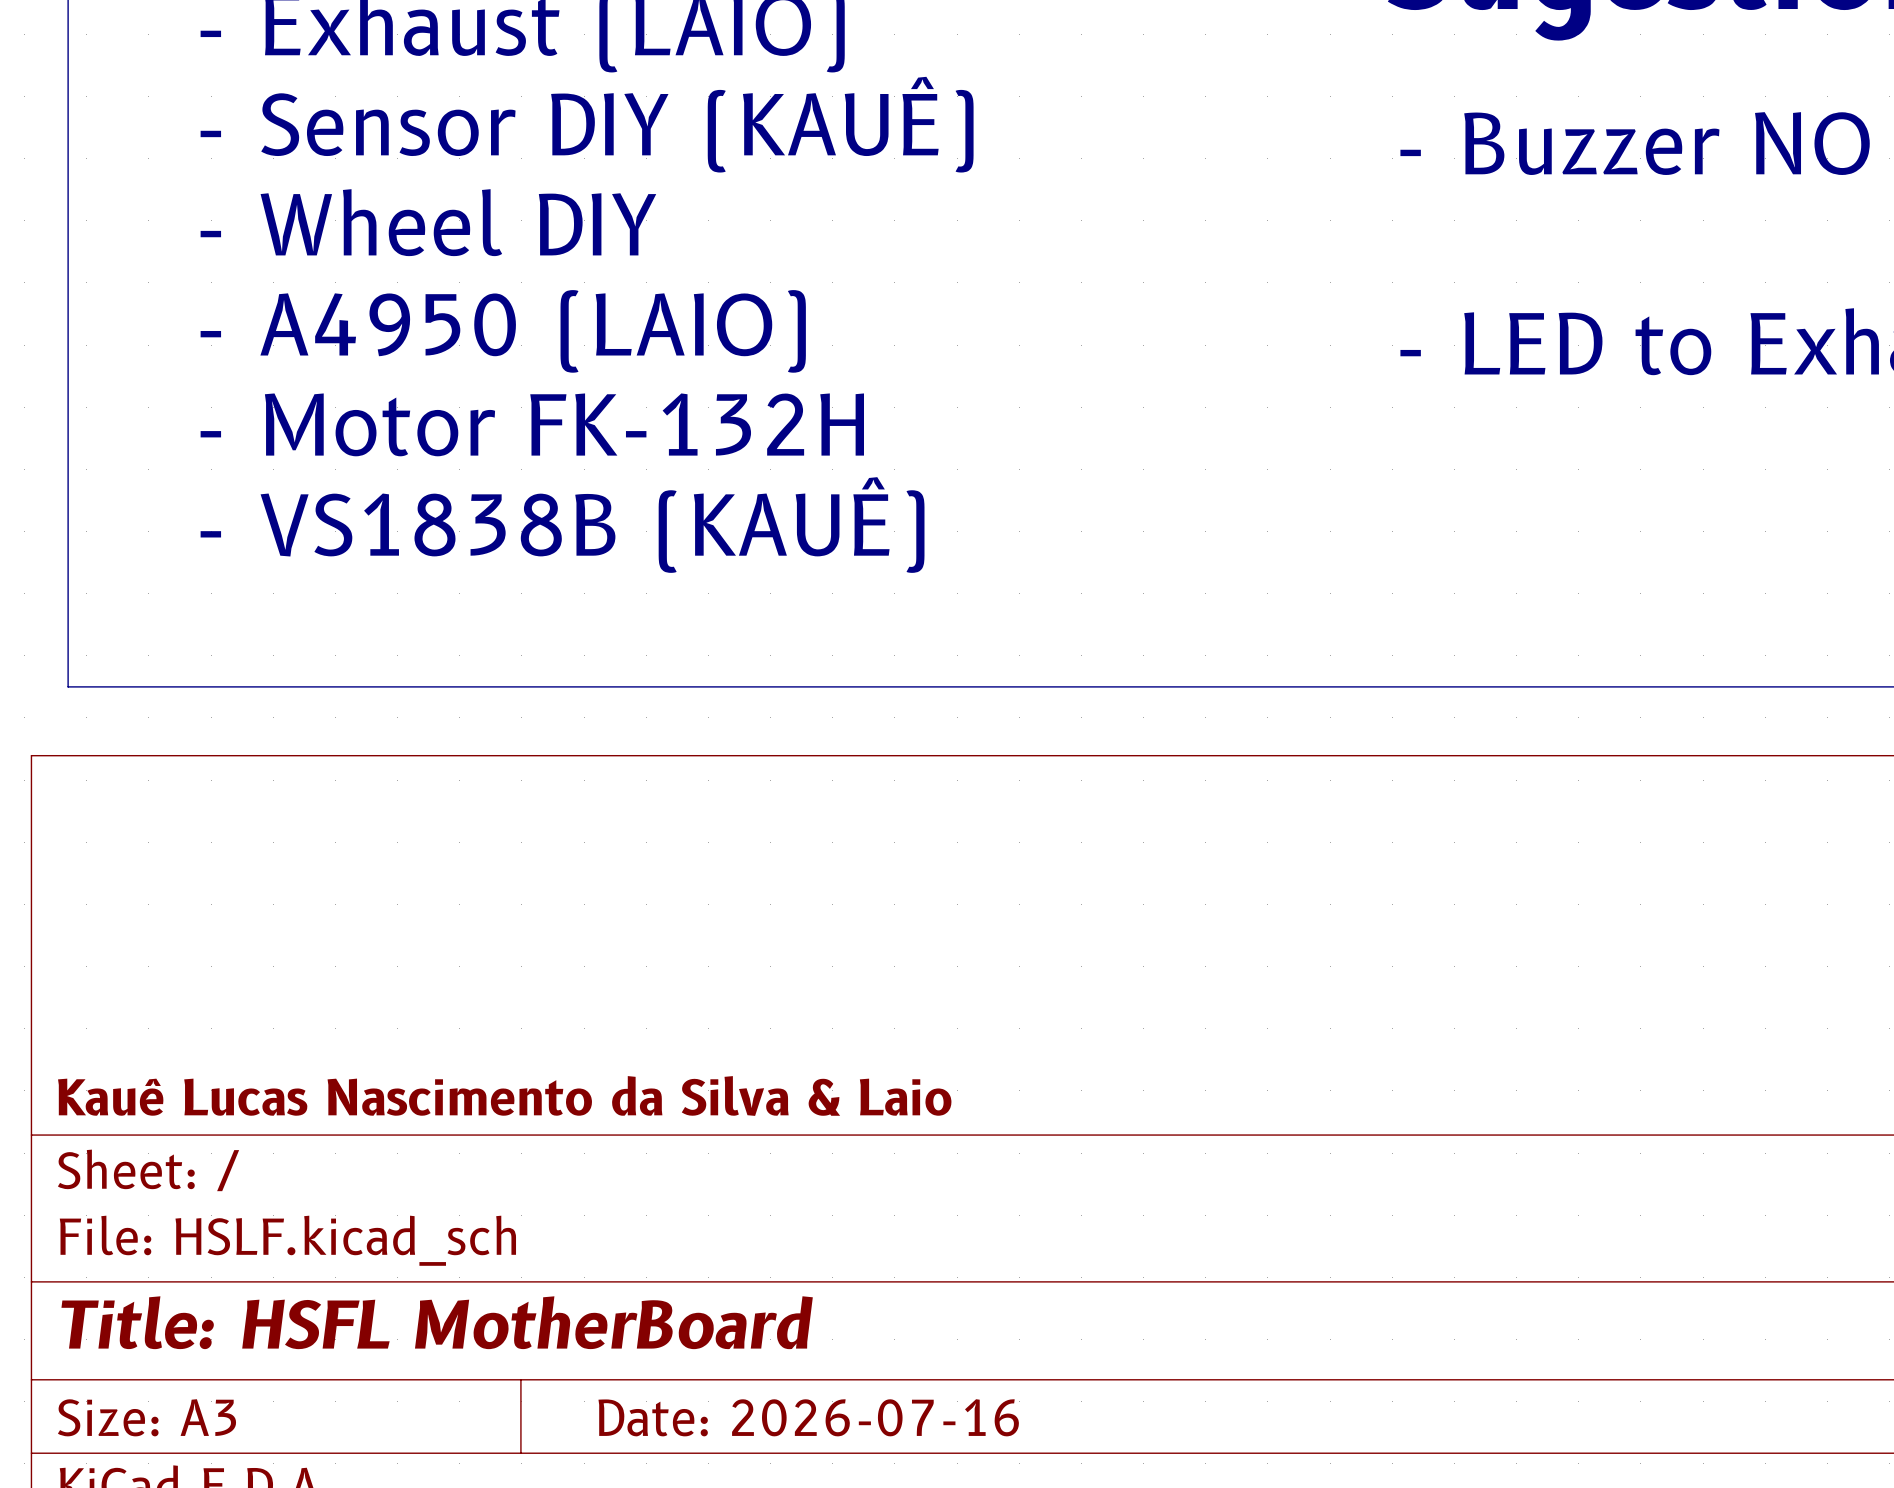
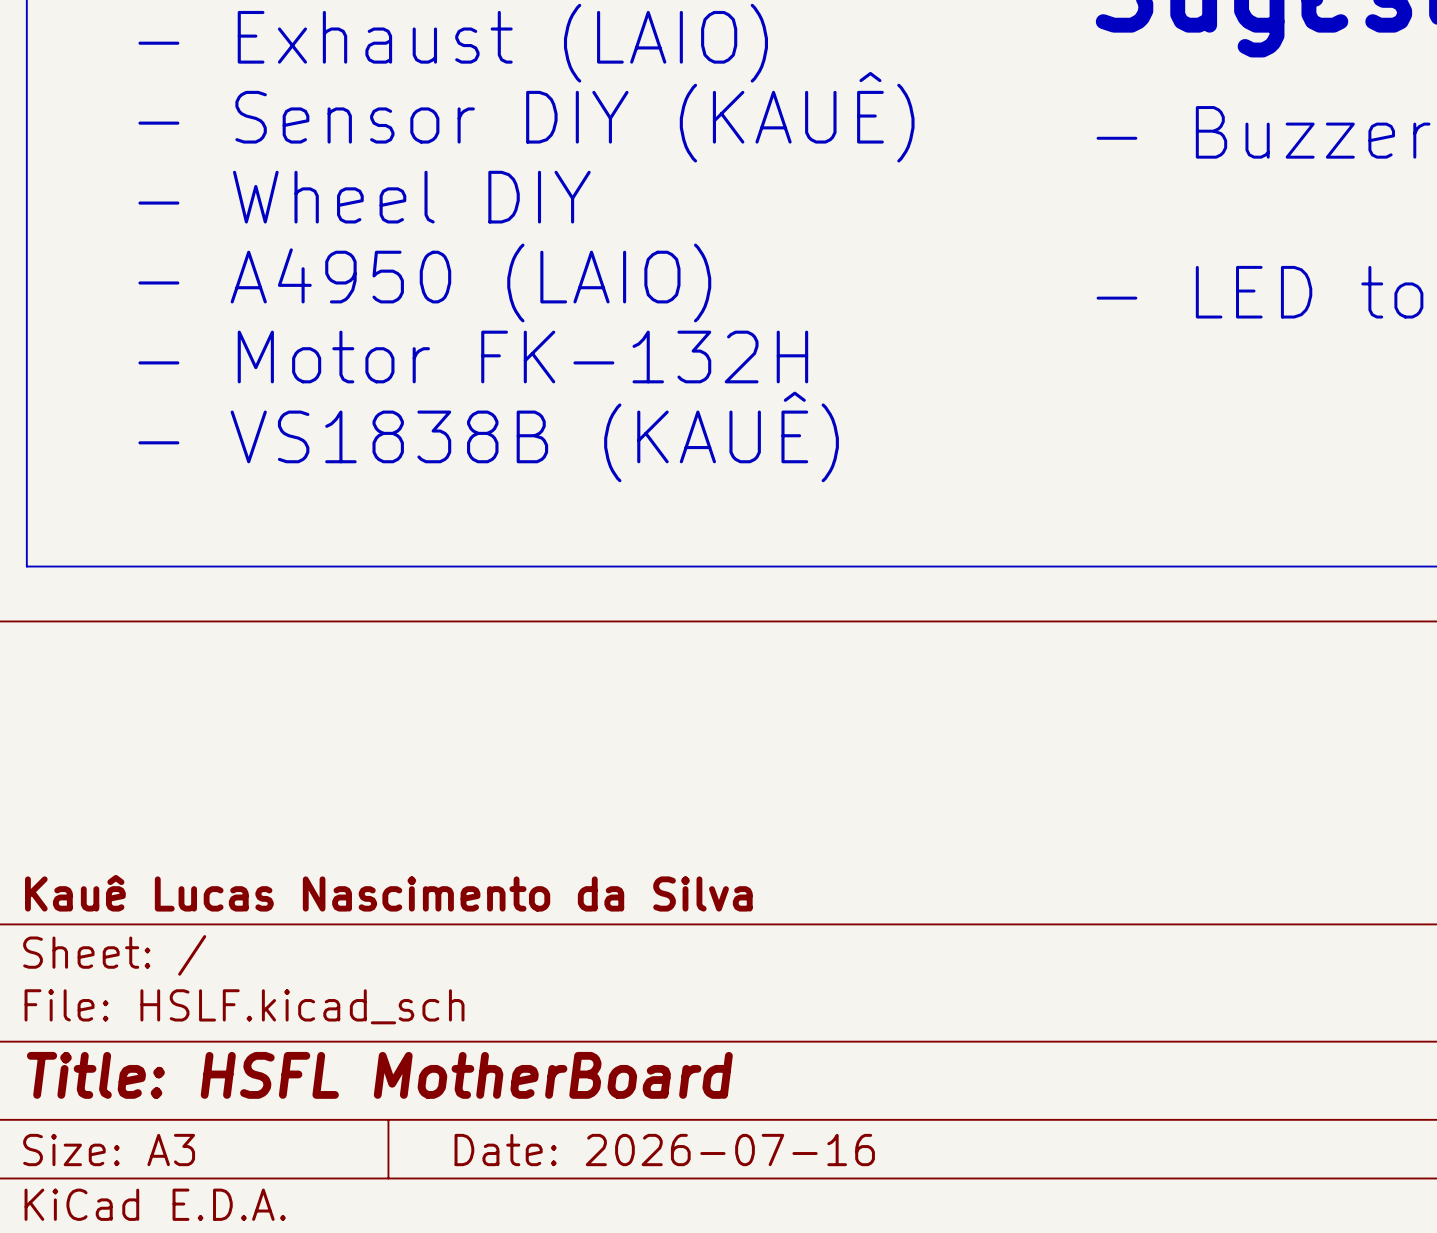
title block: Kauê Lucas Nascimento da Silva & Laio (504, 1095) -> Kauê Lucas Nascimento da Silva (388, 893)

